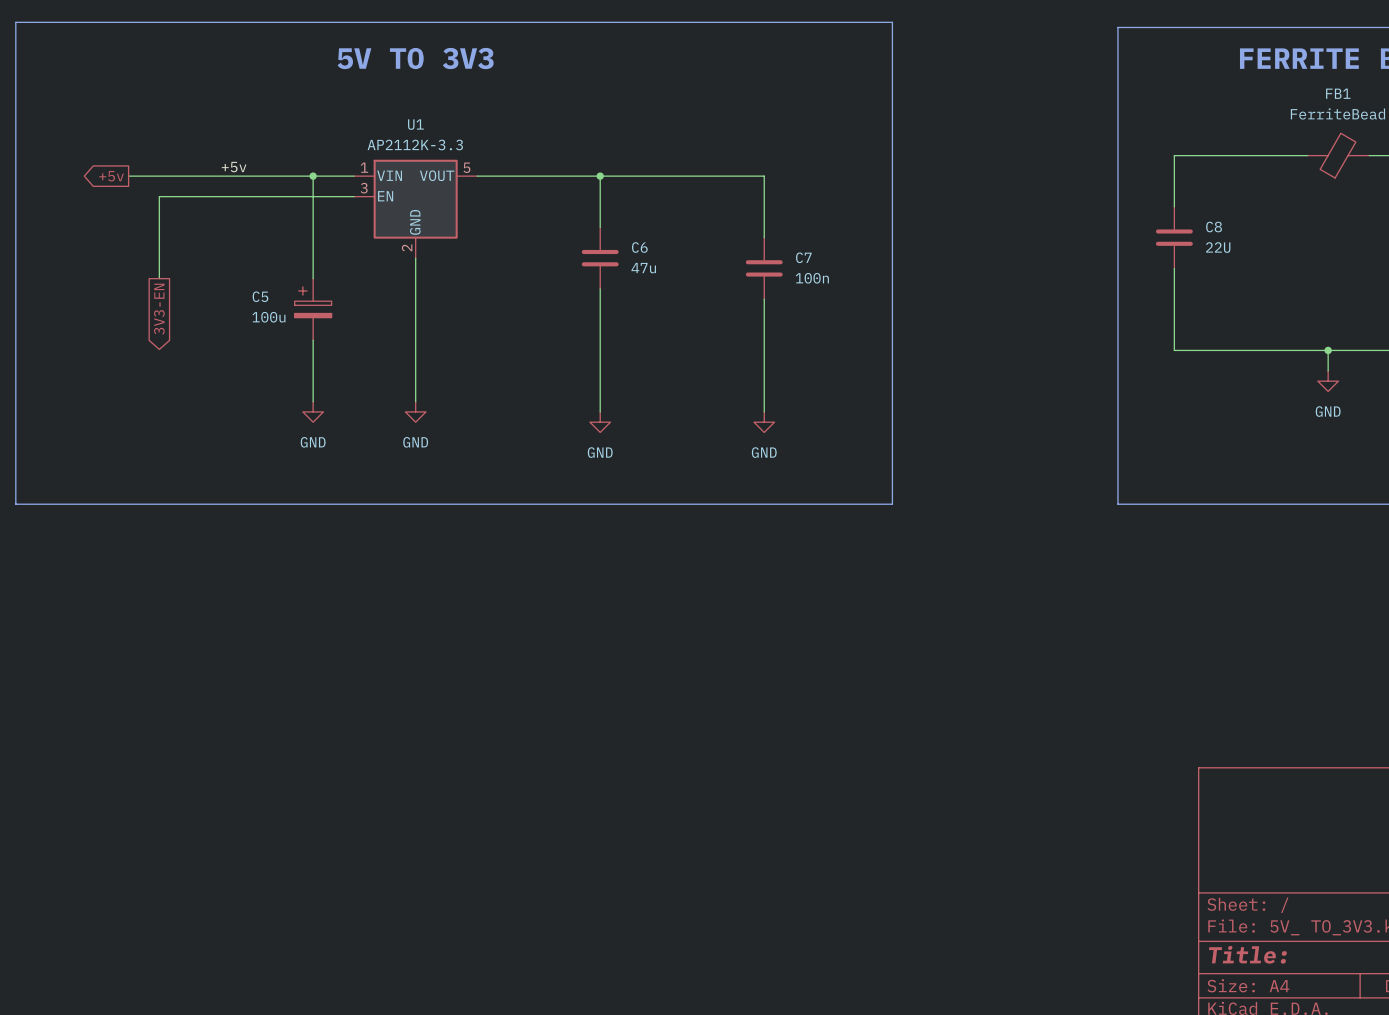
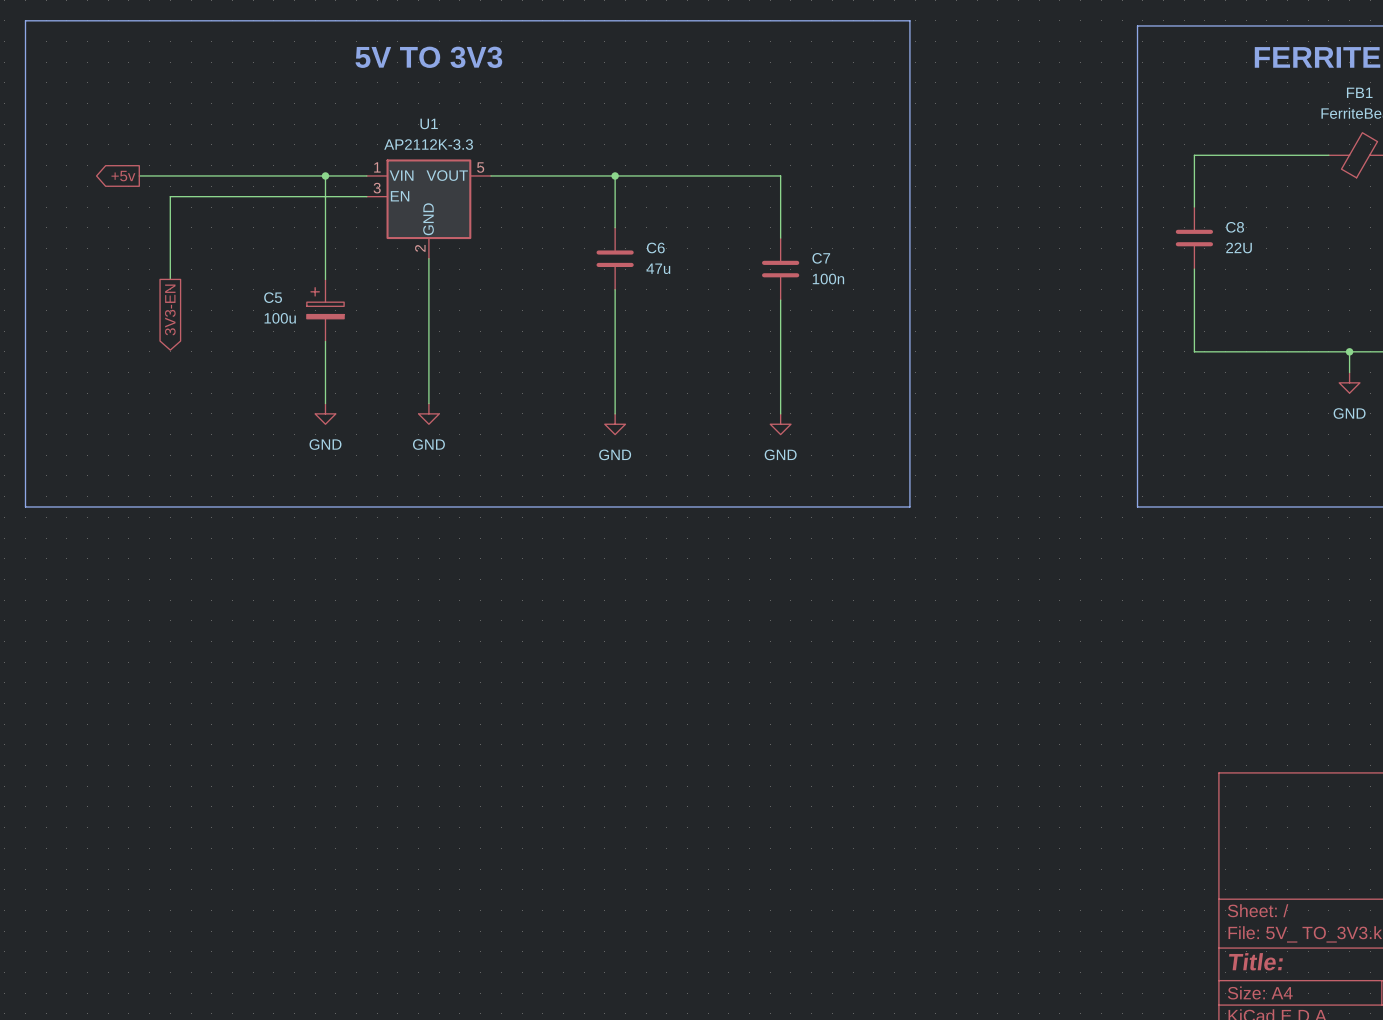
label: +5v (234, 167) -> none

